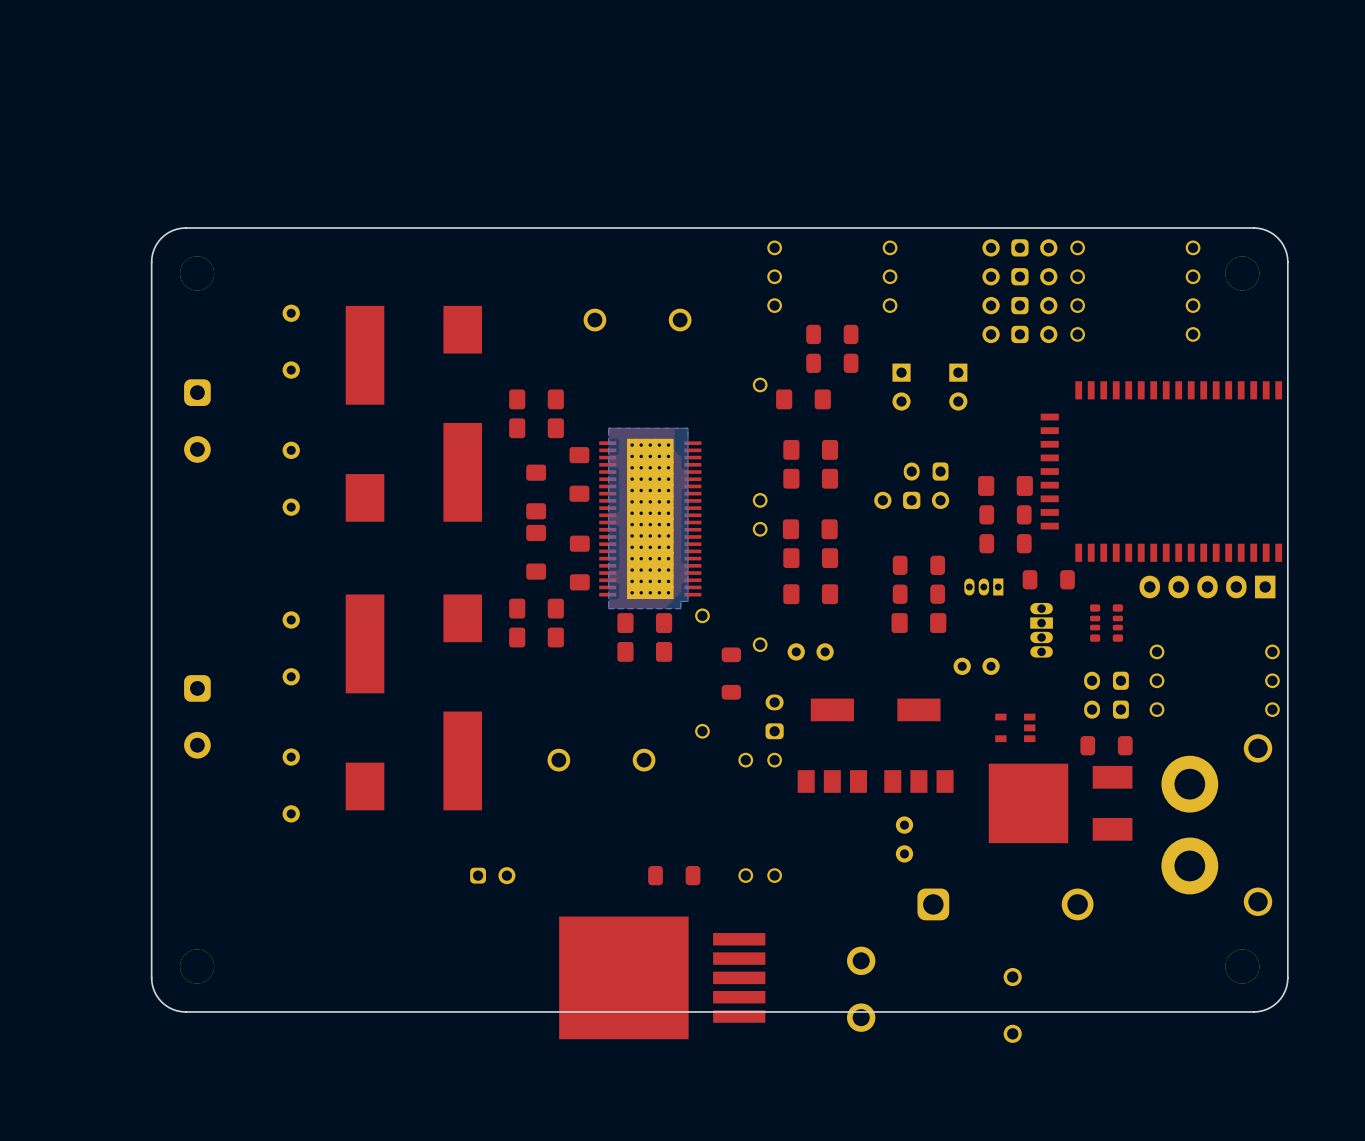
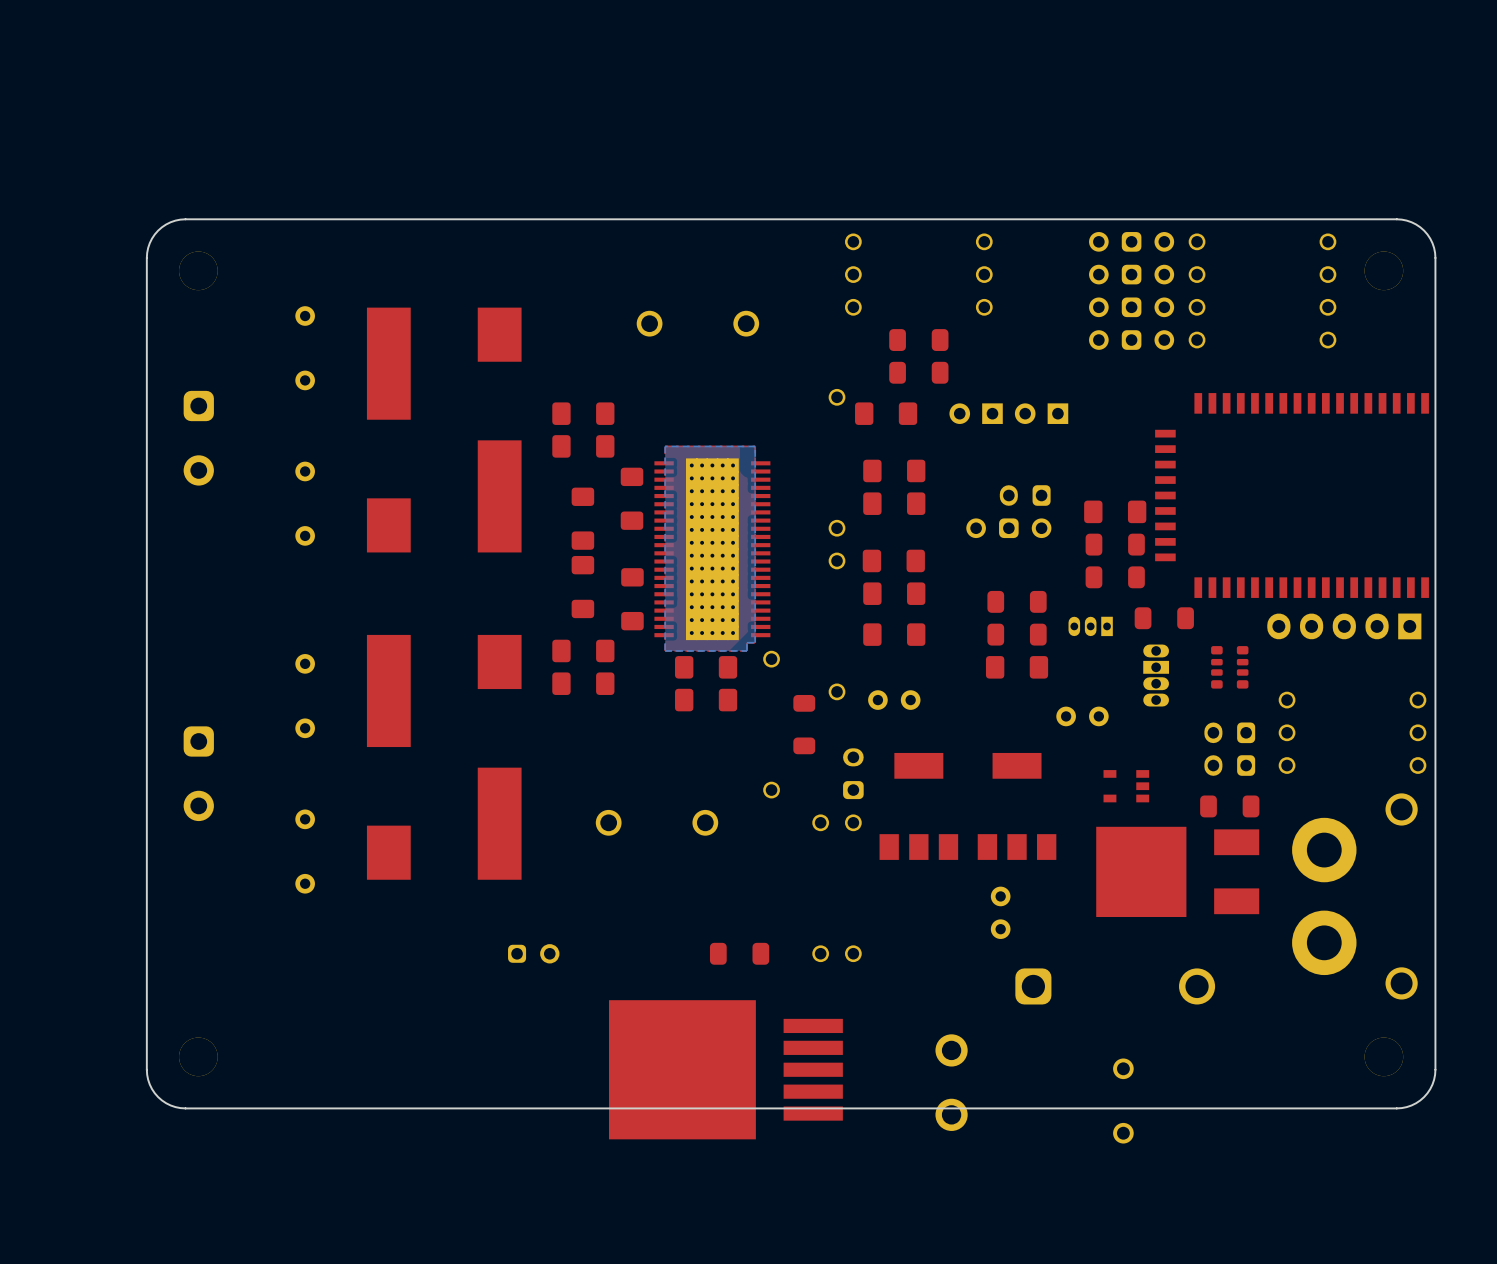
part: (901, 387) -> none
part: (958, 387) -> none
part: none -> (976, 413)
part: none -> (1041, 413)

